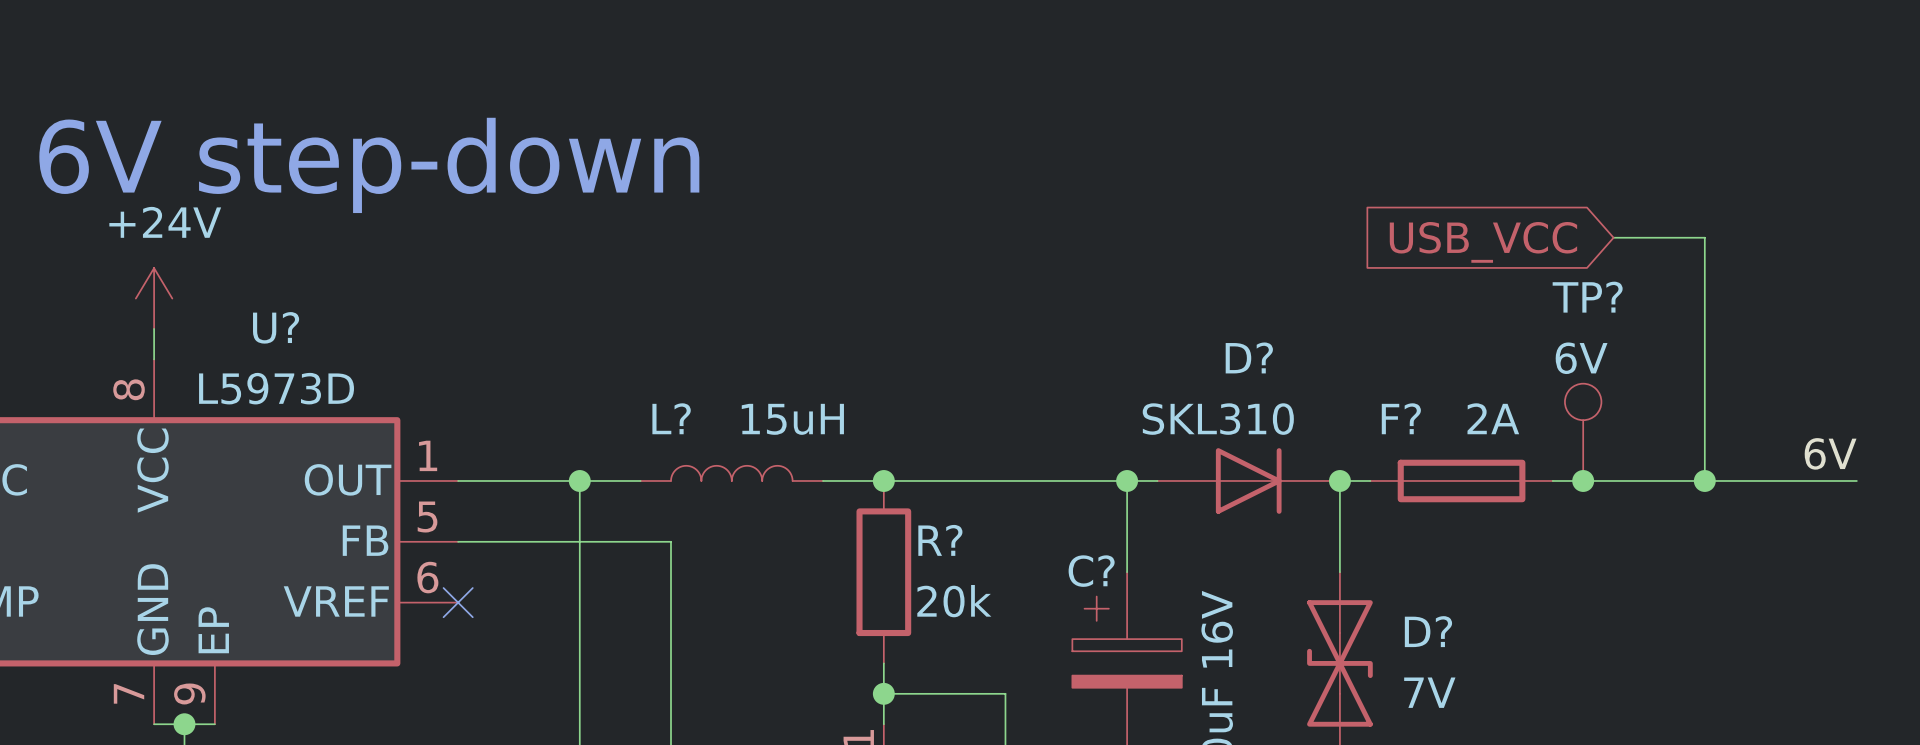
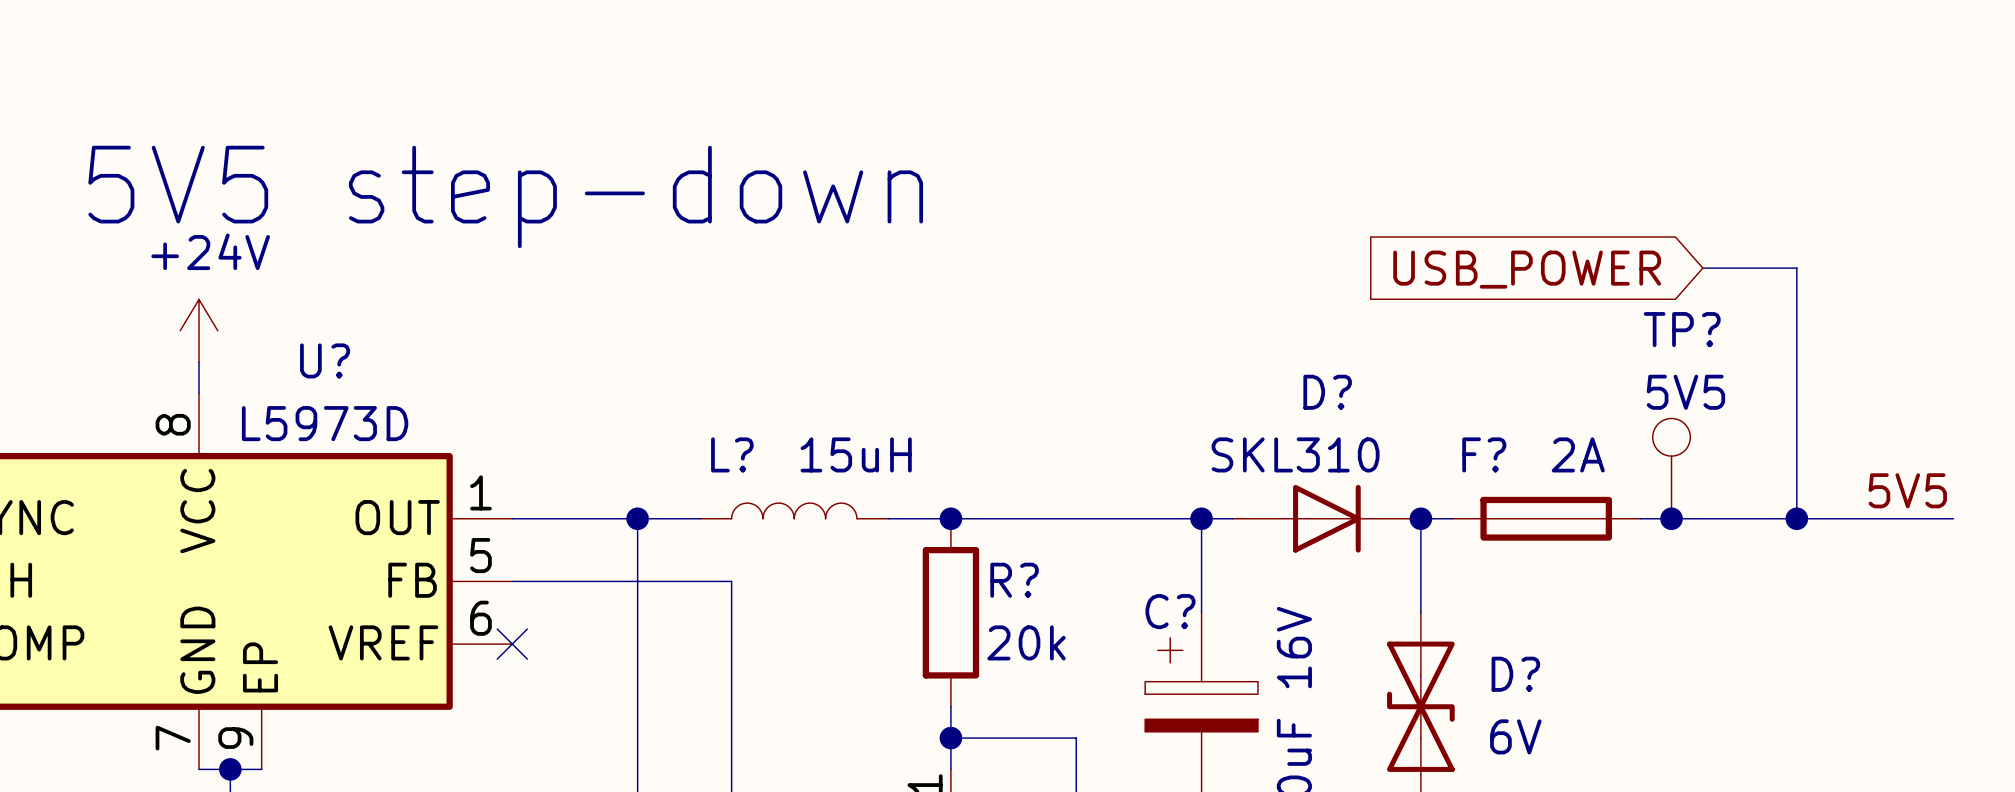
text: 6V step-down (369, 165) -> 5V5 step-down (505, 196)
global label: USB_VCC (1483, 242) -> USB_POWER (1527, 269)
TP? value: 6V (1581, 358) -> 5V5 (1685, 392)
label: 6V (1830, 453) -> 5V5 (1907, 490)
D? value: 7V (1429, 692) -> 6V (1515, 736)

